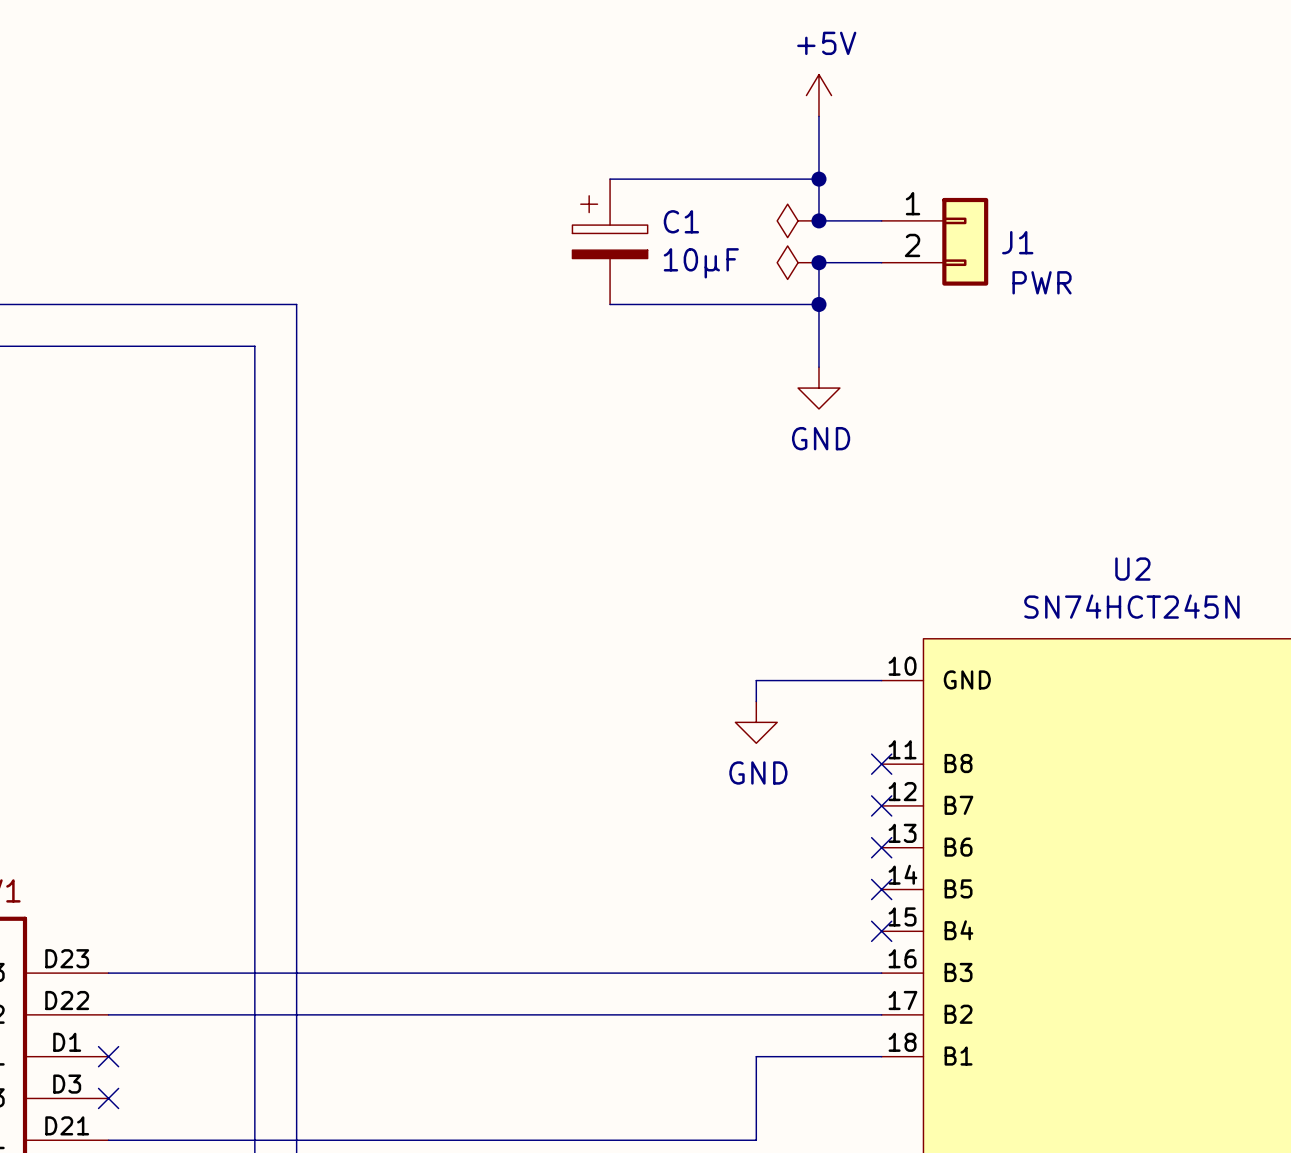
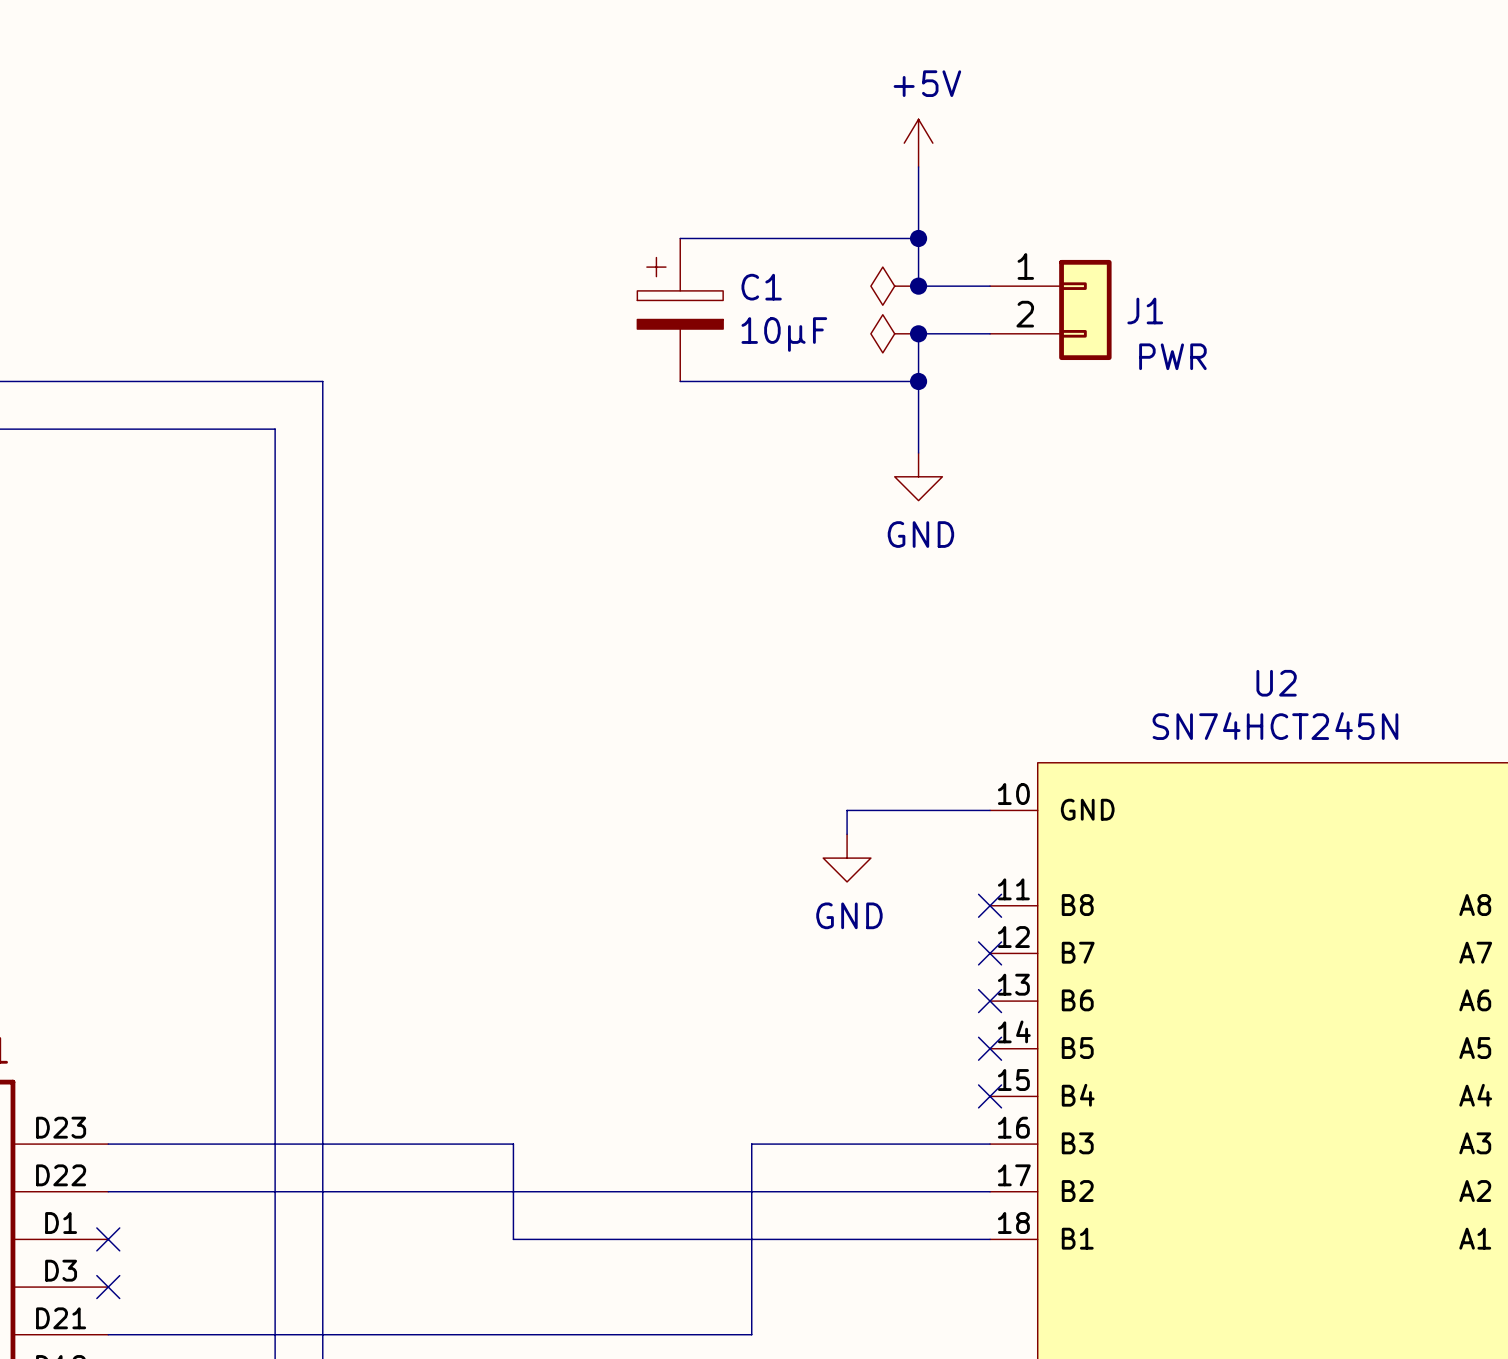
wire: (463, 973) (672, 973) -> (513, 1144) (513, 1239) (847, 1239)
wire: (756, 1056) (756, 1140) (672, 1140) -> (751, 1144) (751, 1334)

